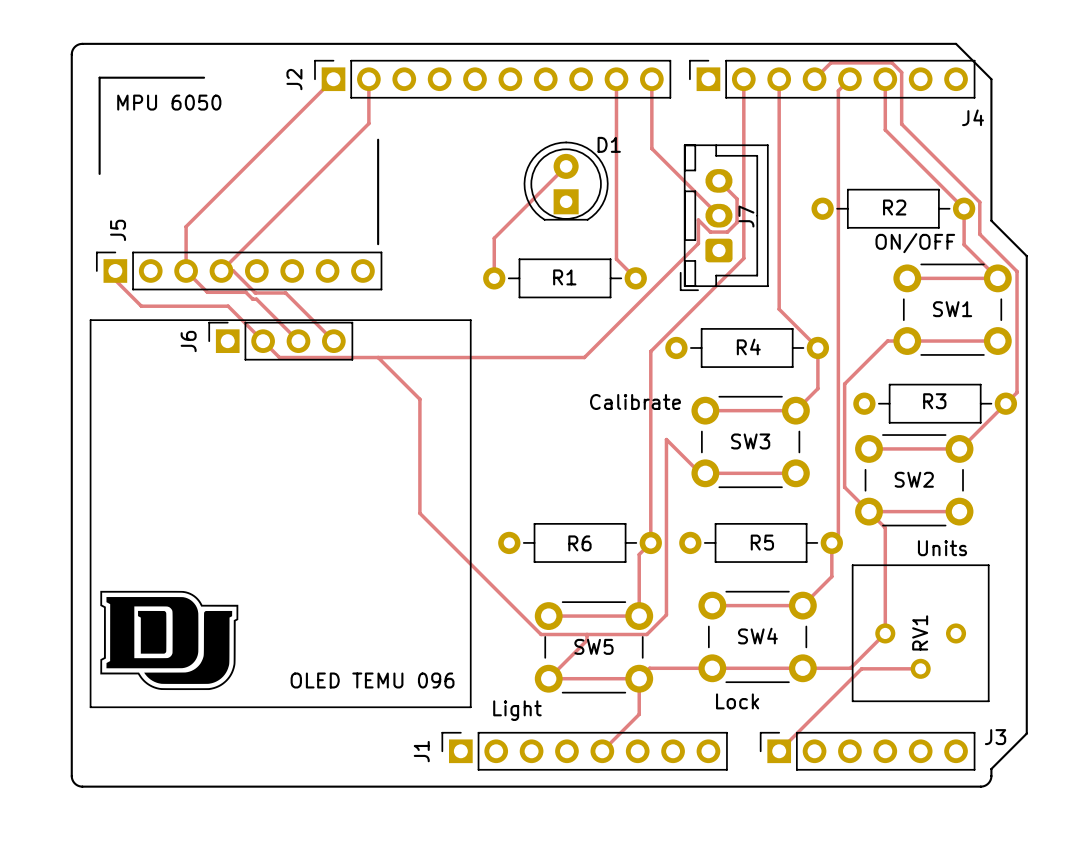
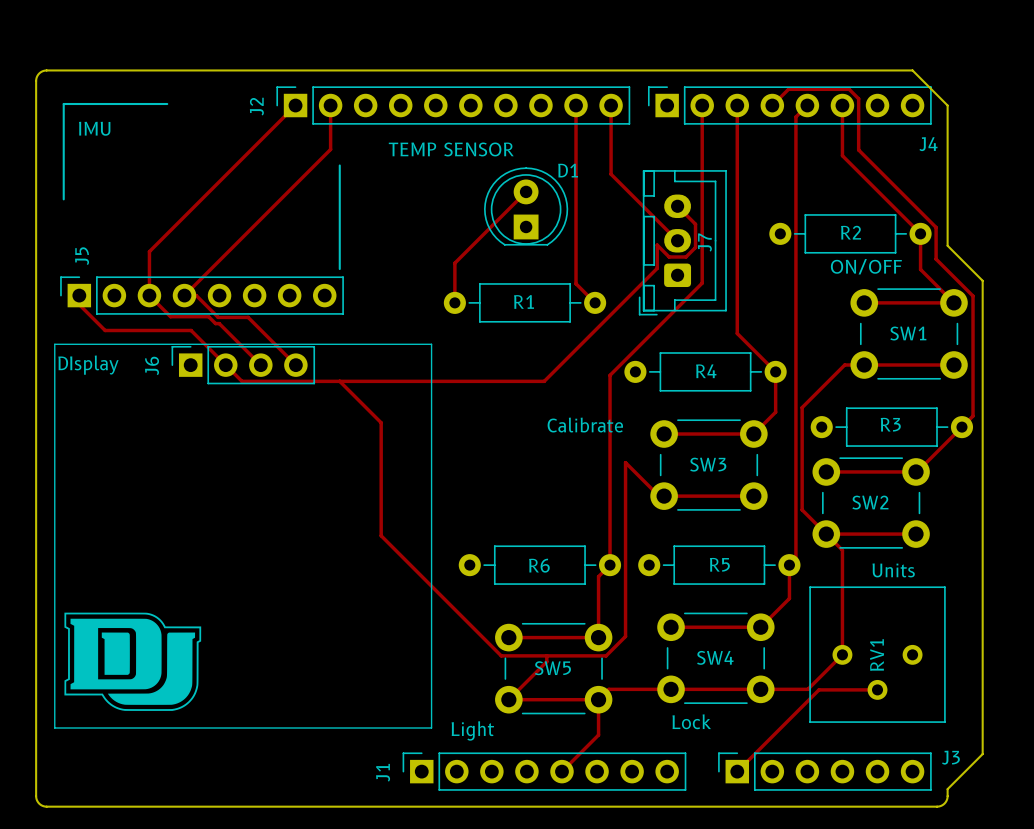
text: MPU 6050 (169, 102) -> IMU (94, 128)
text: none -> TEMP SENSOR (451, 149)
text: none -> DIsplay (88, 365)
text: OLED TEMU 096 (372, 680) -> none

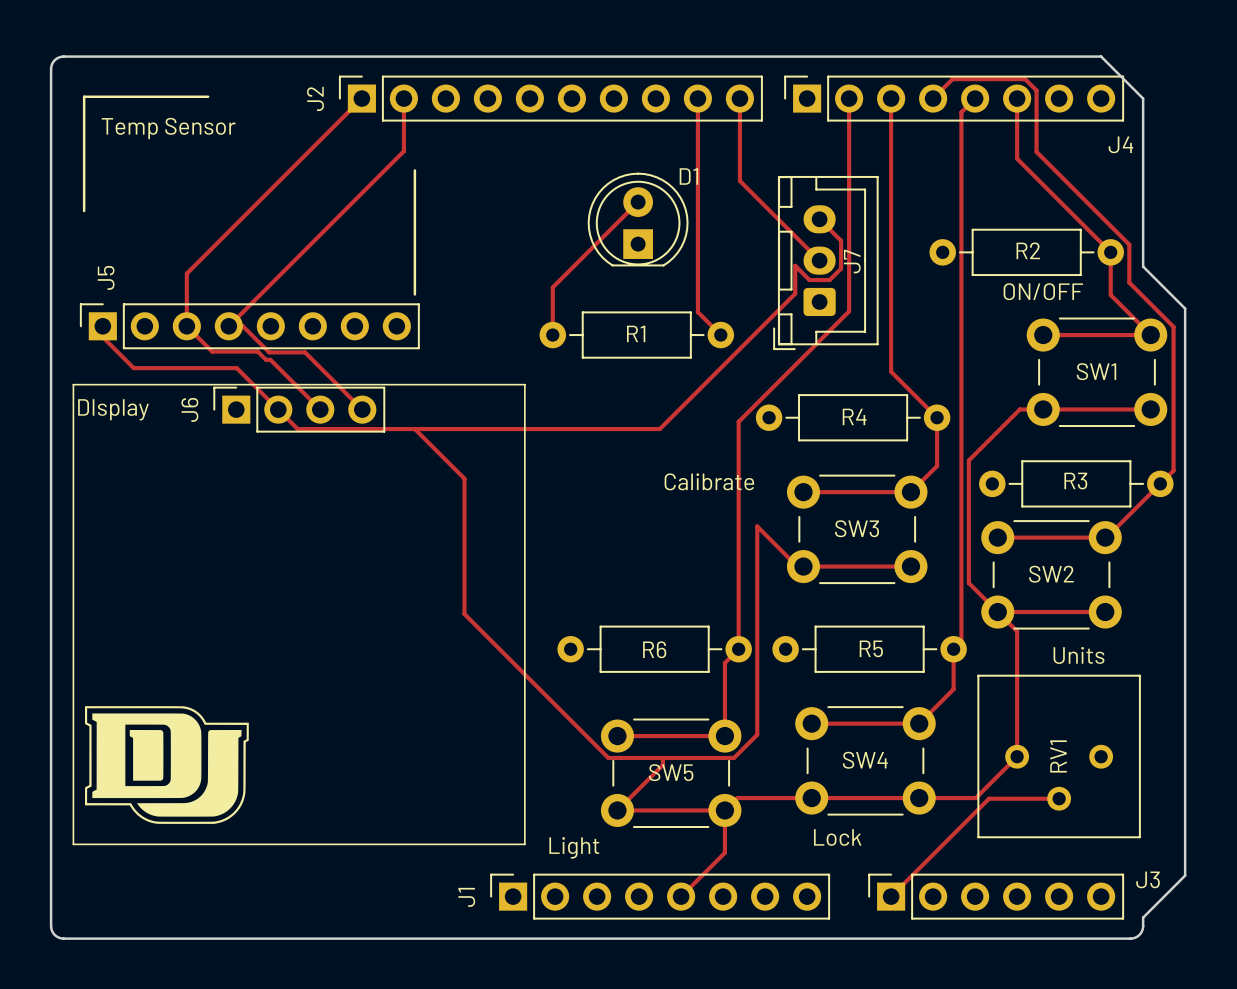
text: IMU (94, 128) -> Temp Sensor (168, 128)
text: TEMP SENSOR (451, 149) -> none

